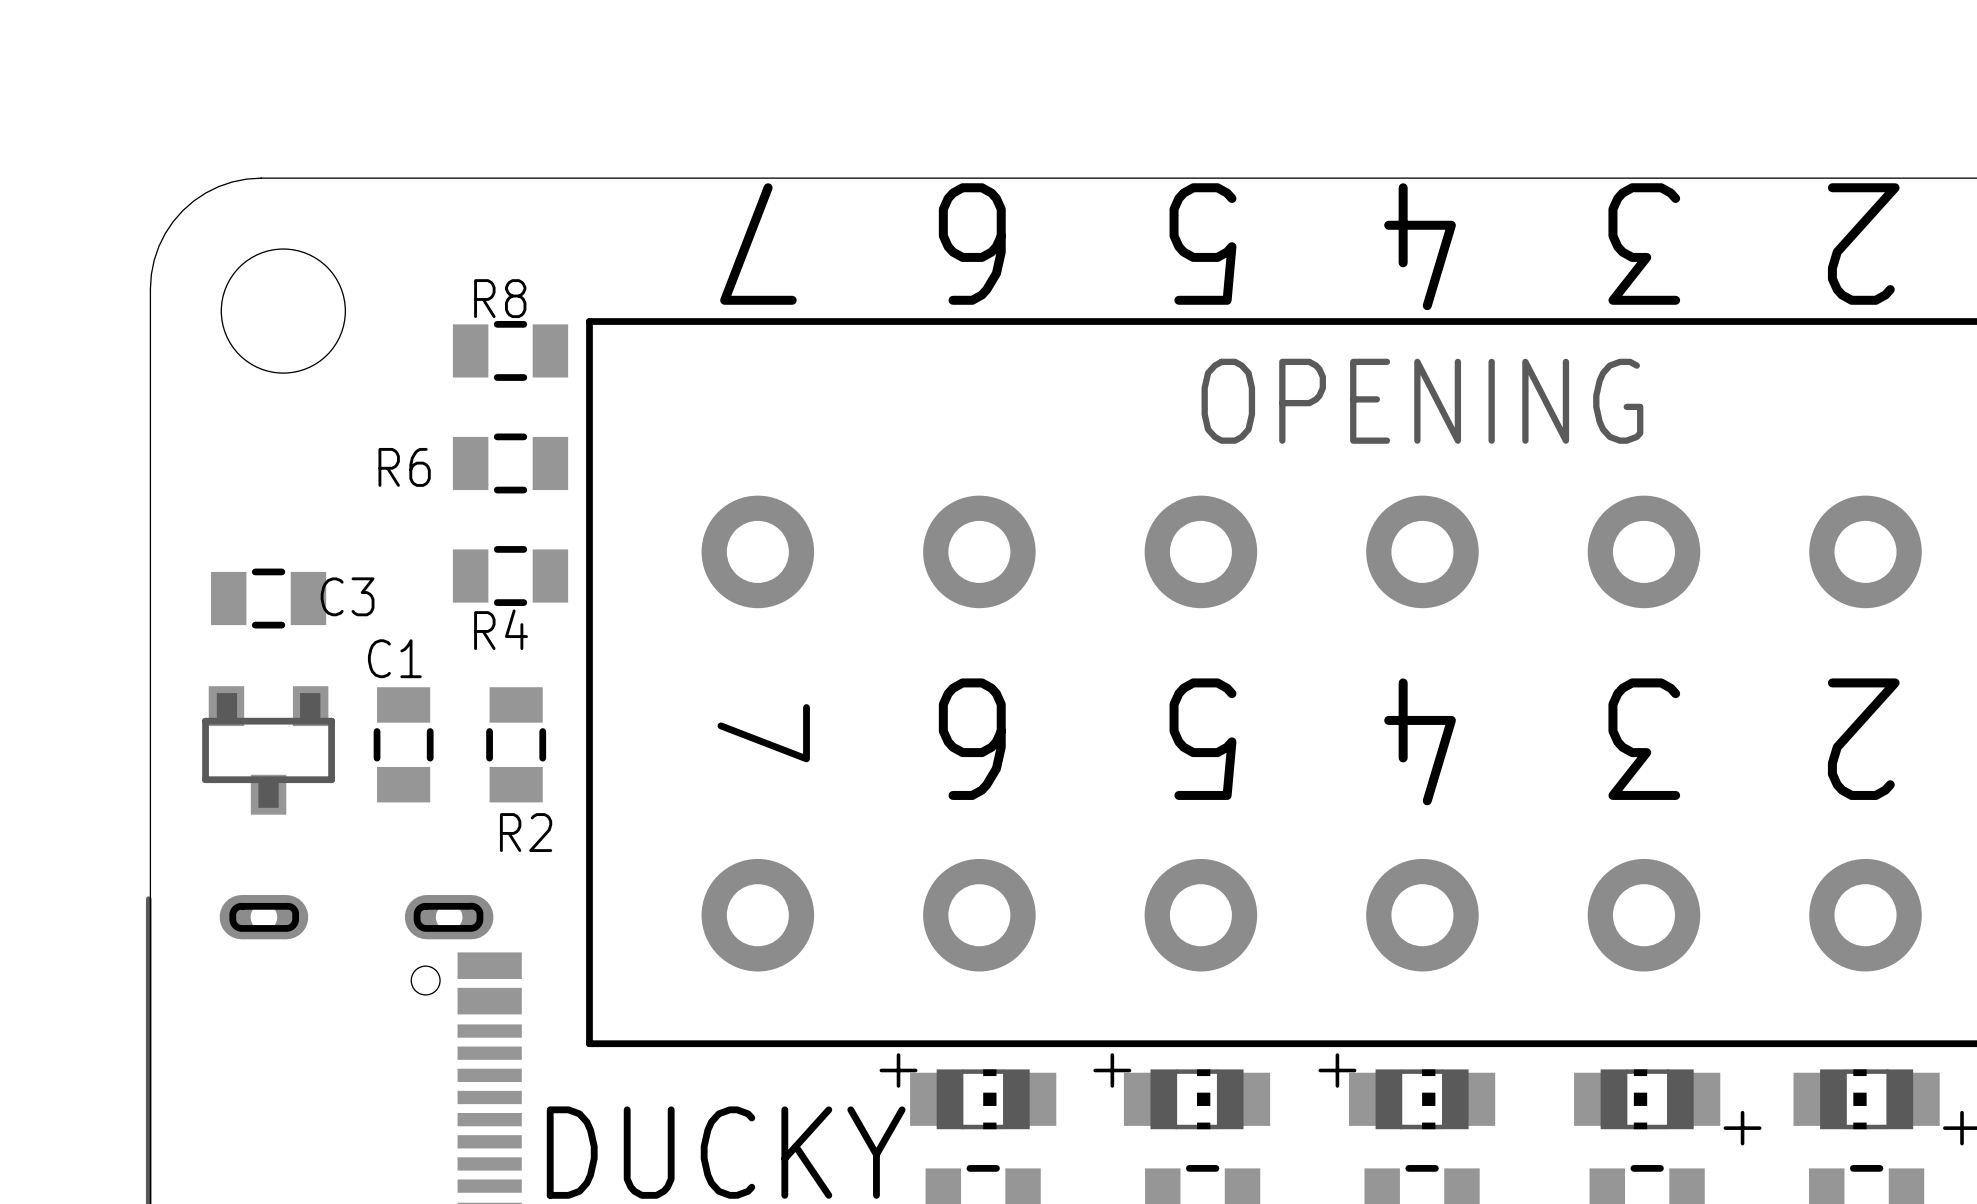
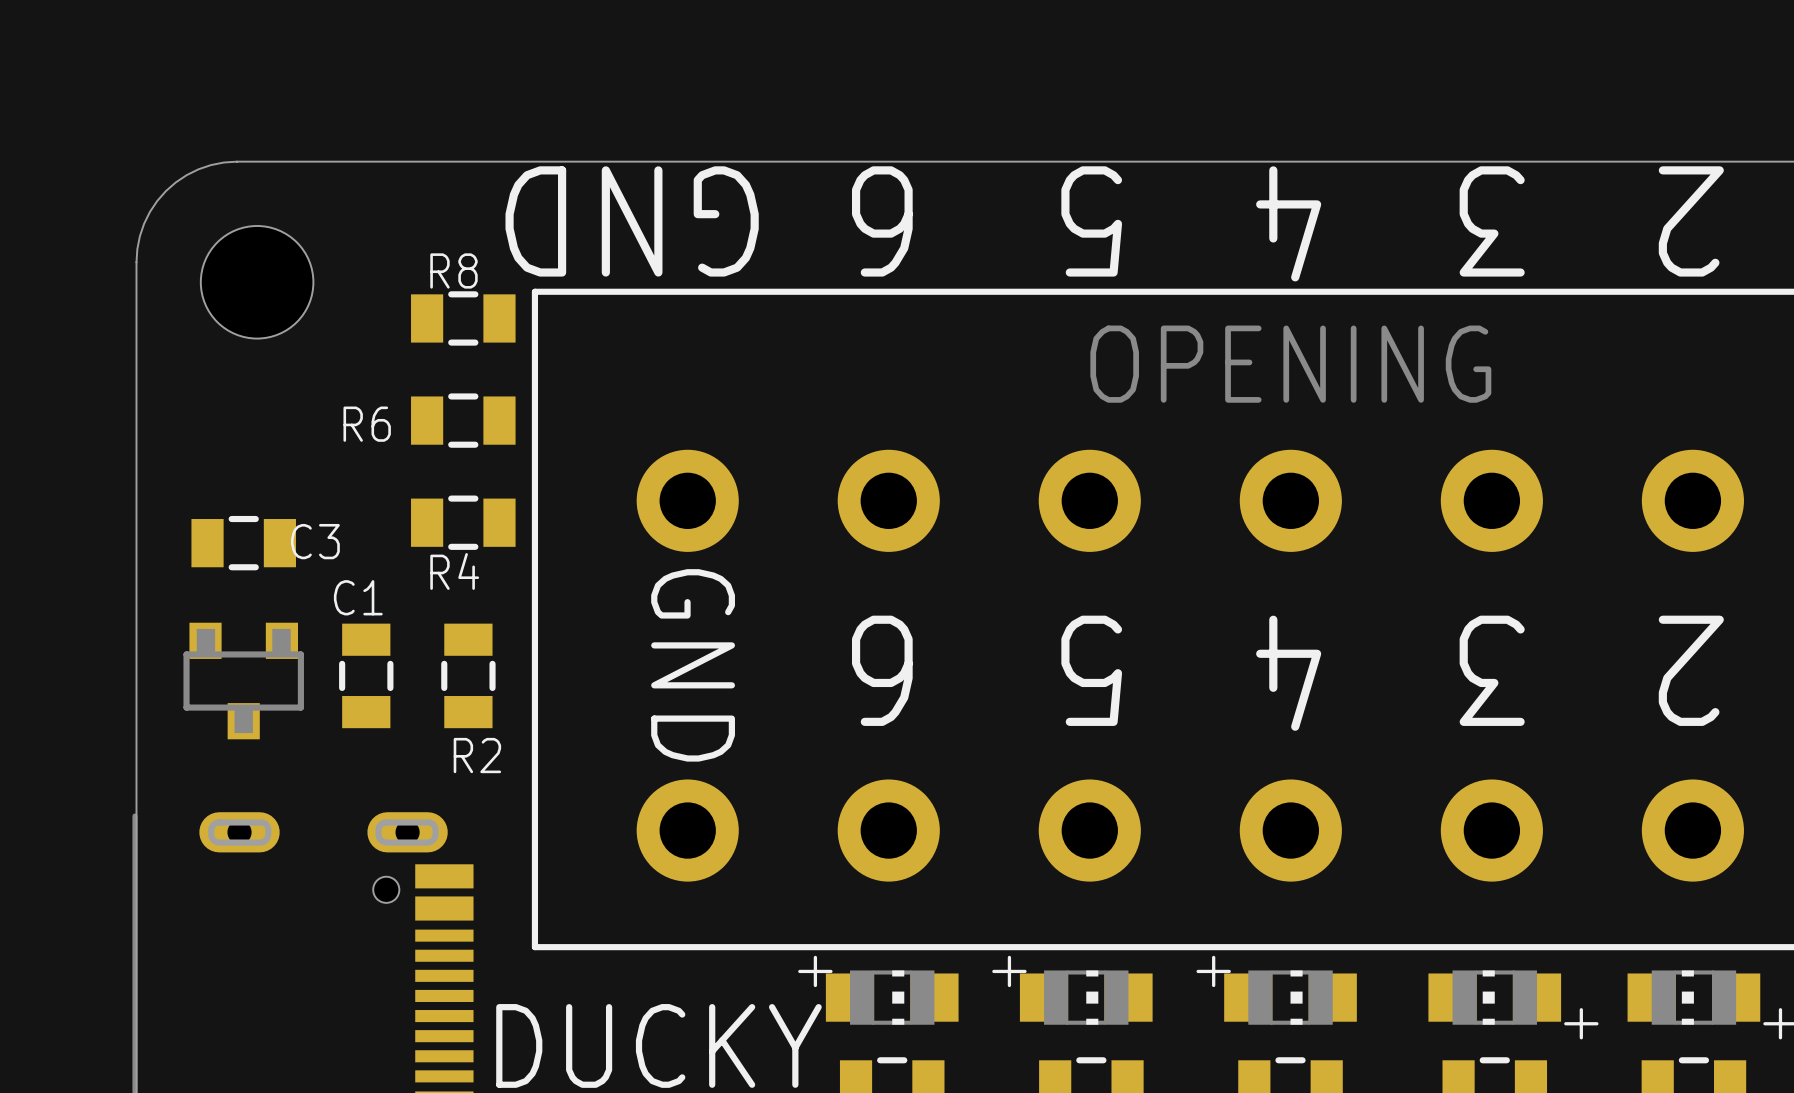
text: none -> GND (632, 221)
text: 7 (758, 244) -> none
text: 7 (763, 733) -> GND (693, 665)

